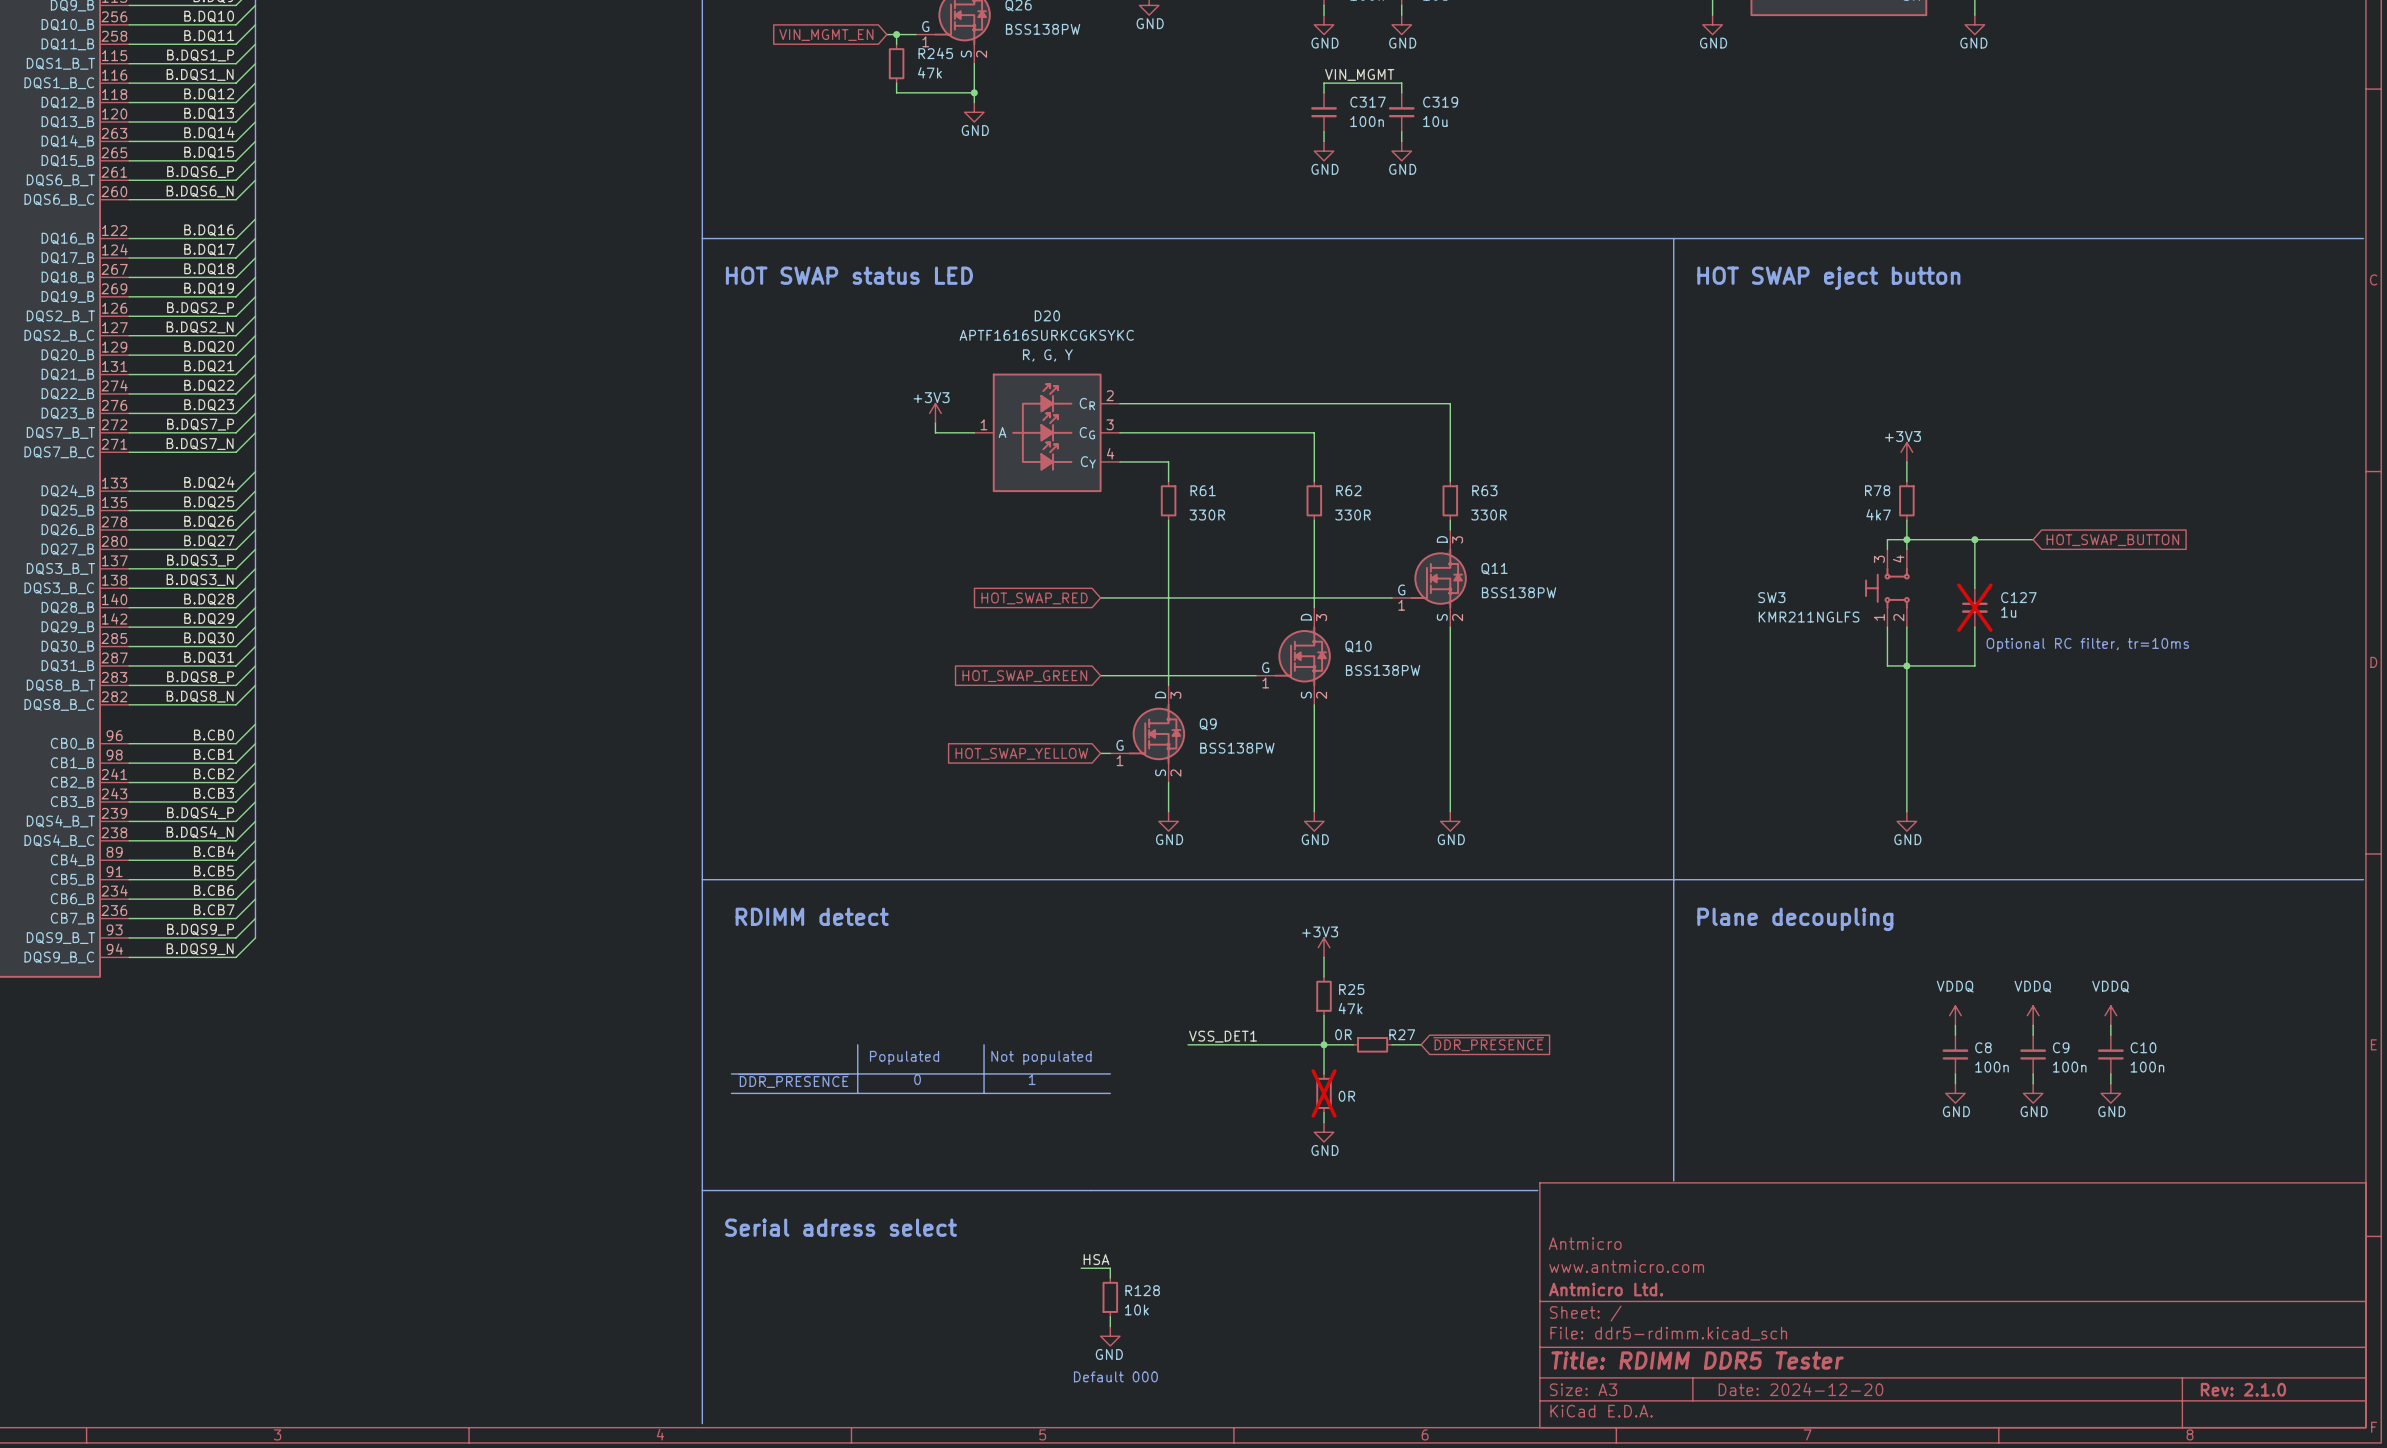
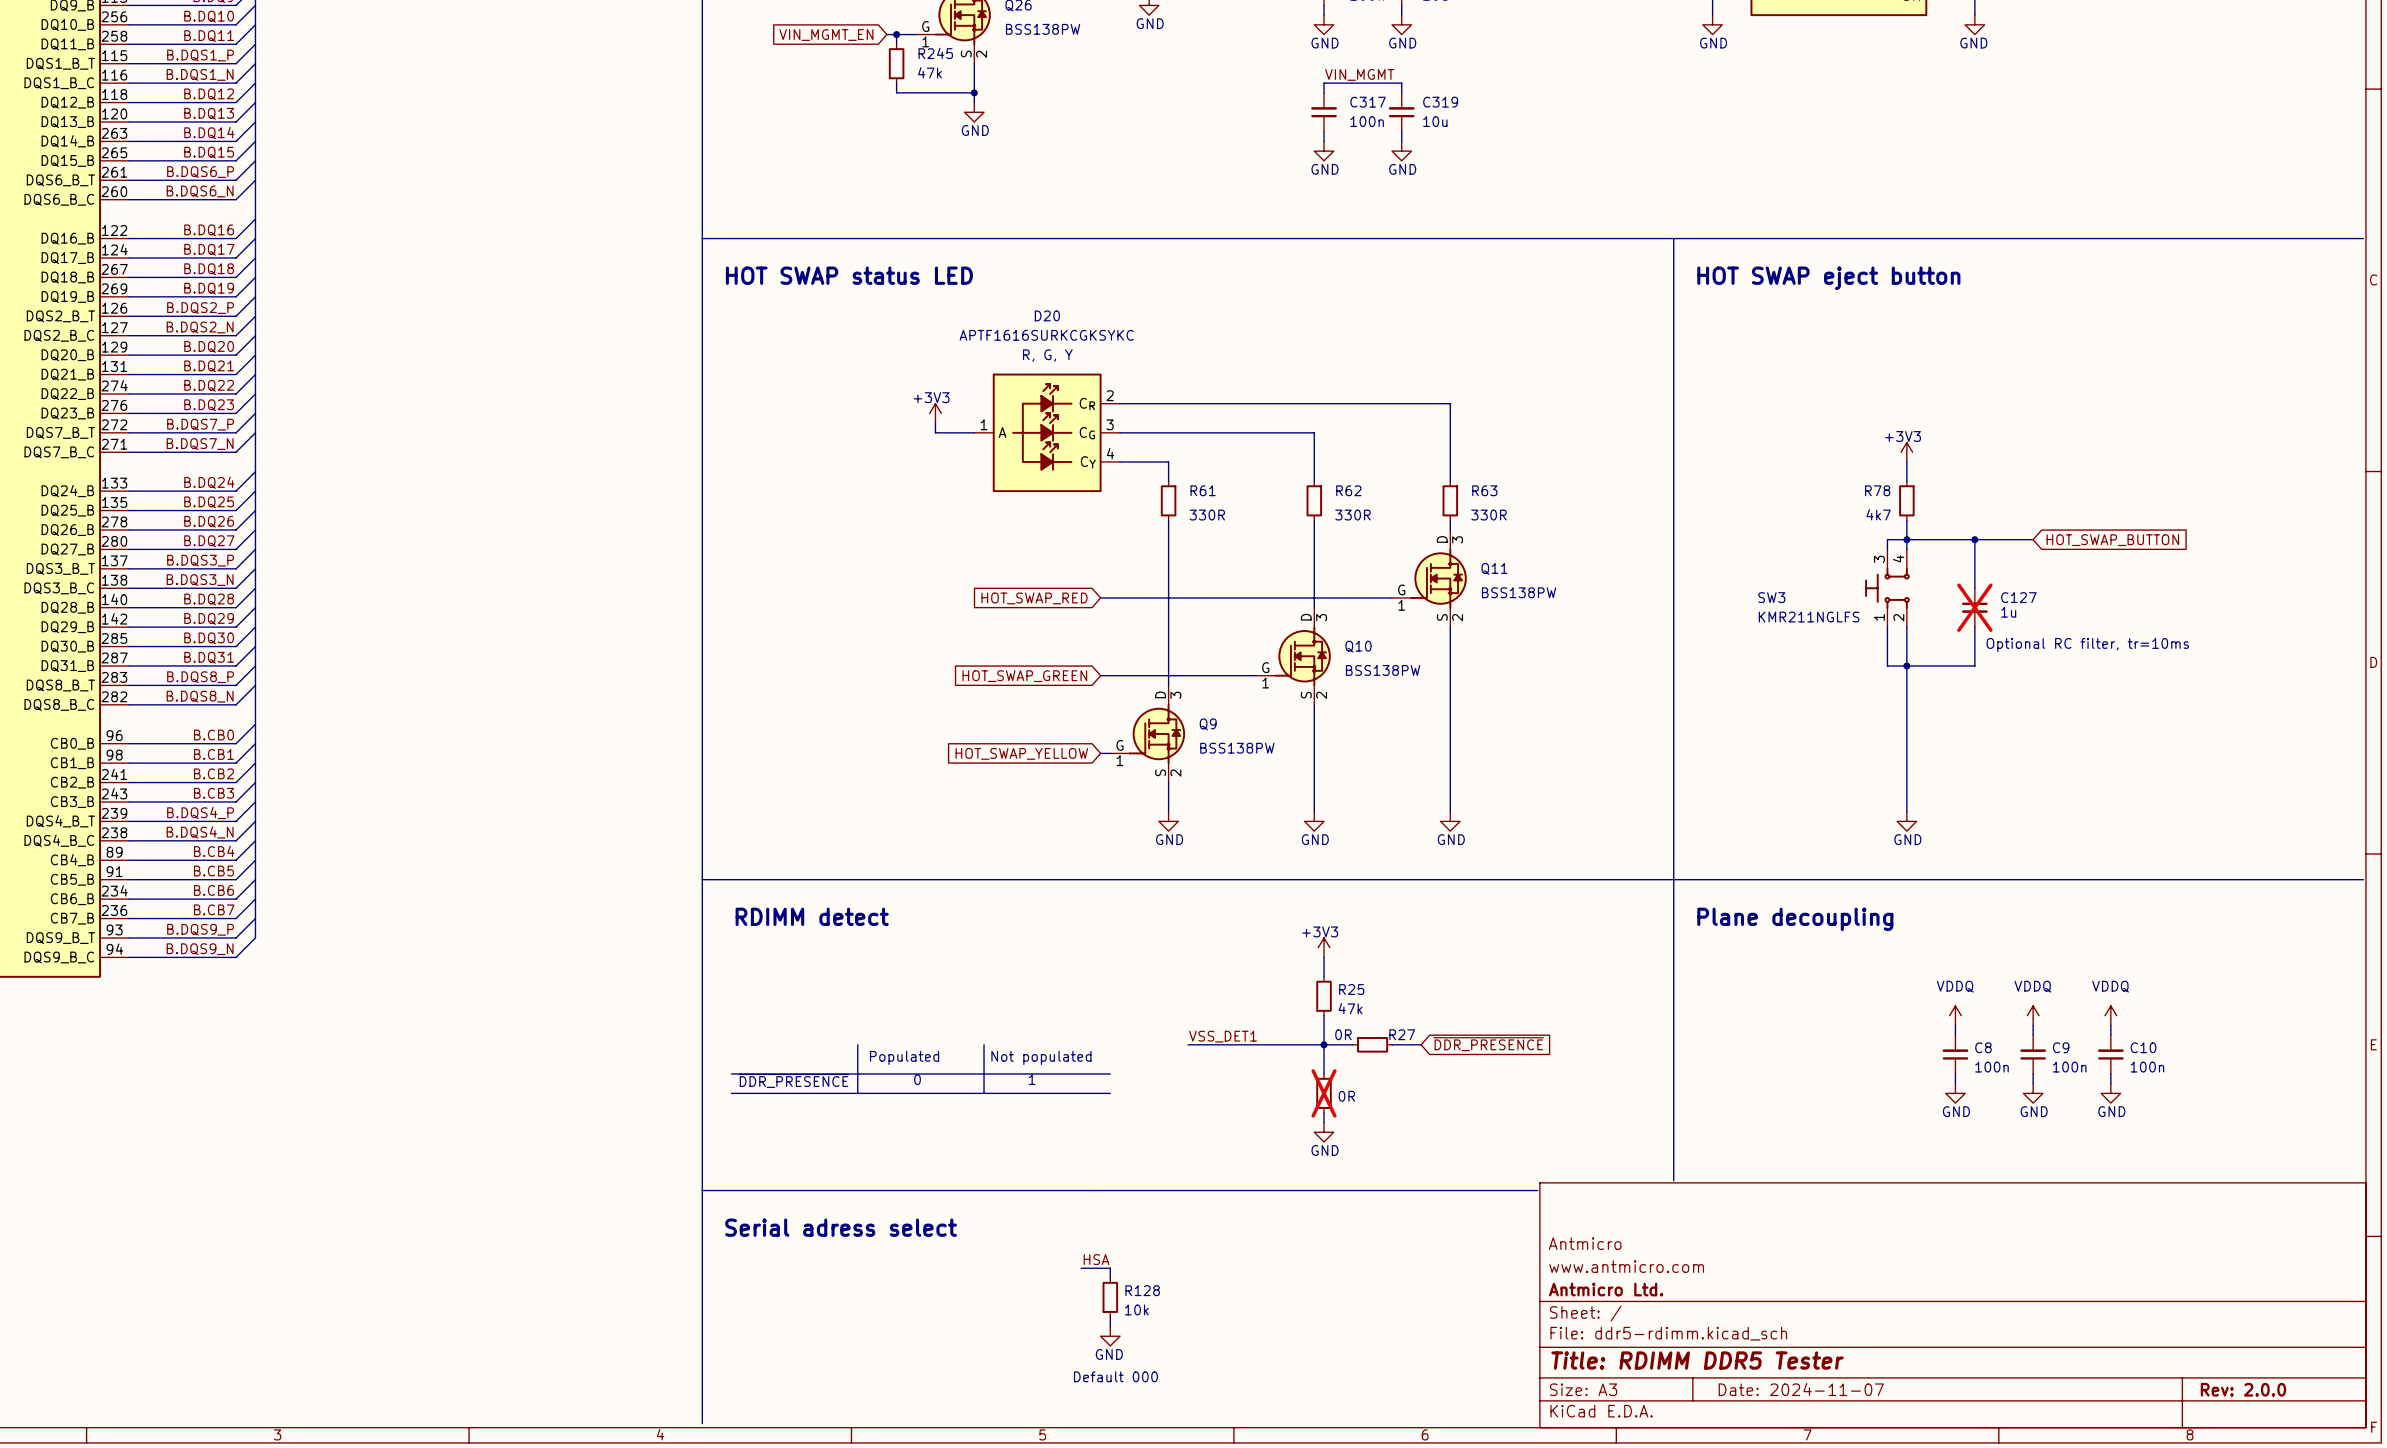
title block: Date: 2024-12-20 (1800, 1389) -> Date: 2024-11-07 (1801, 1389)
title block: Rev: 2.1.0 (2243, 1389) -> Rev: 2.0.0 (2243, 1389)

